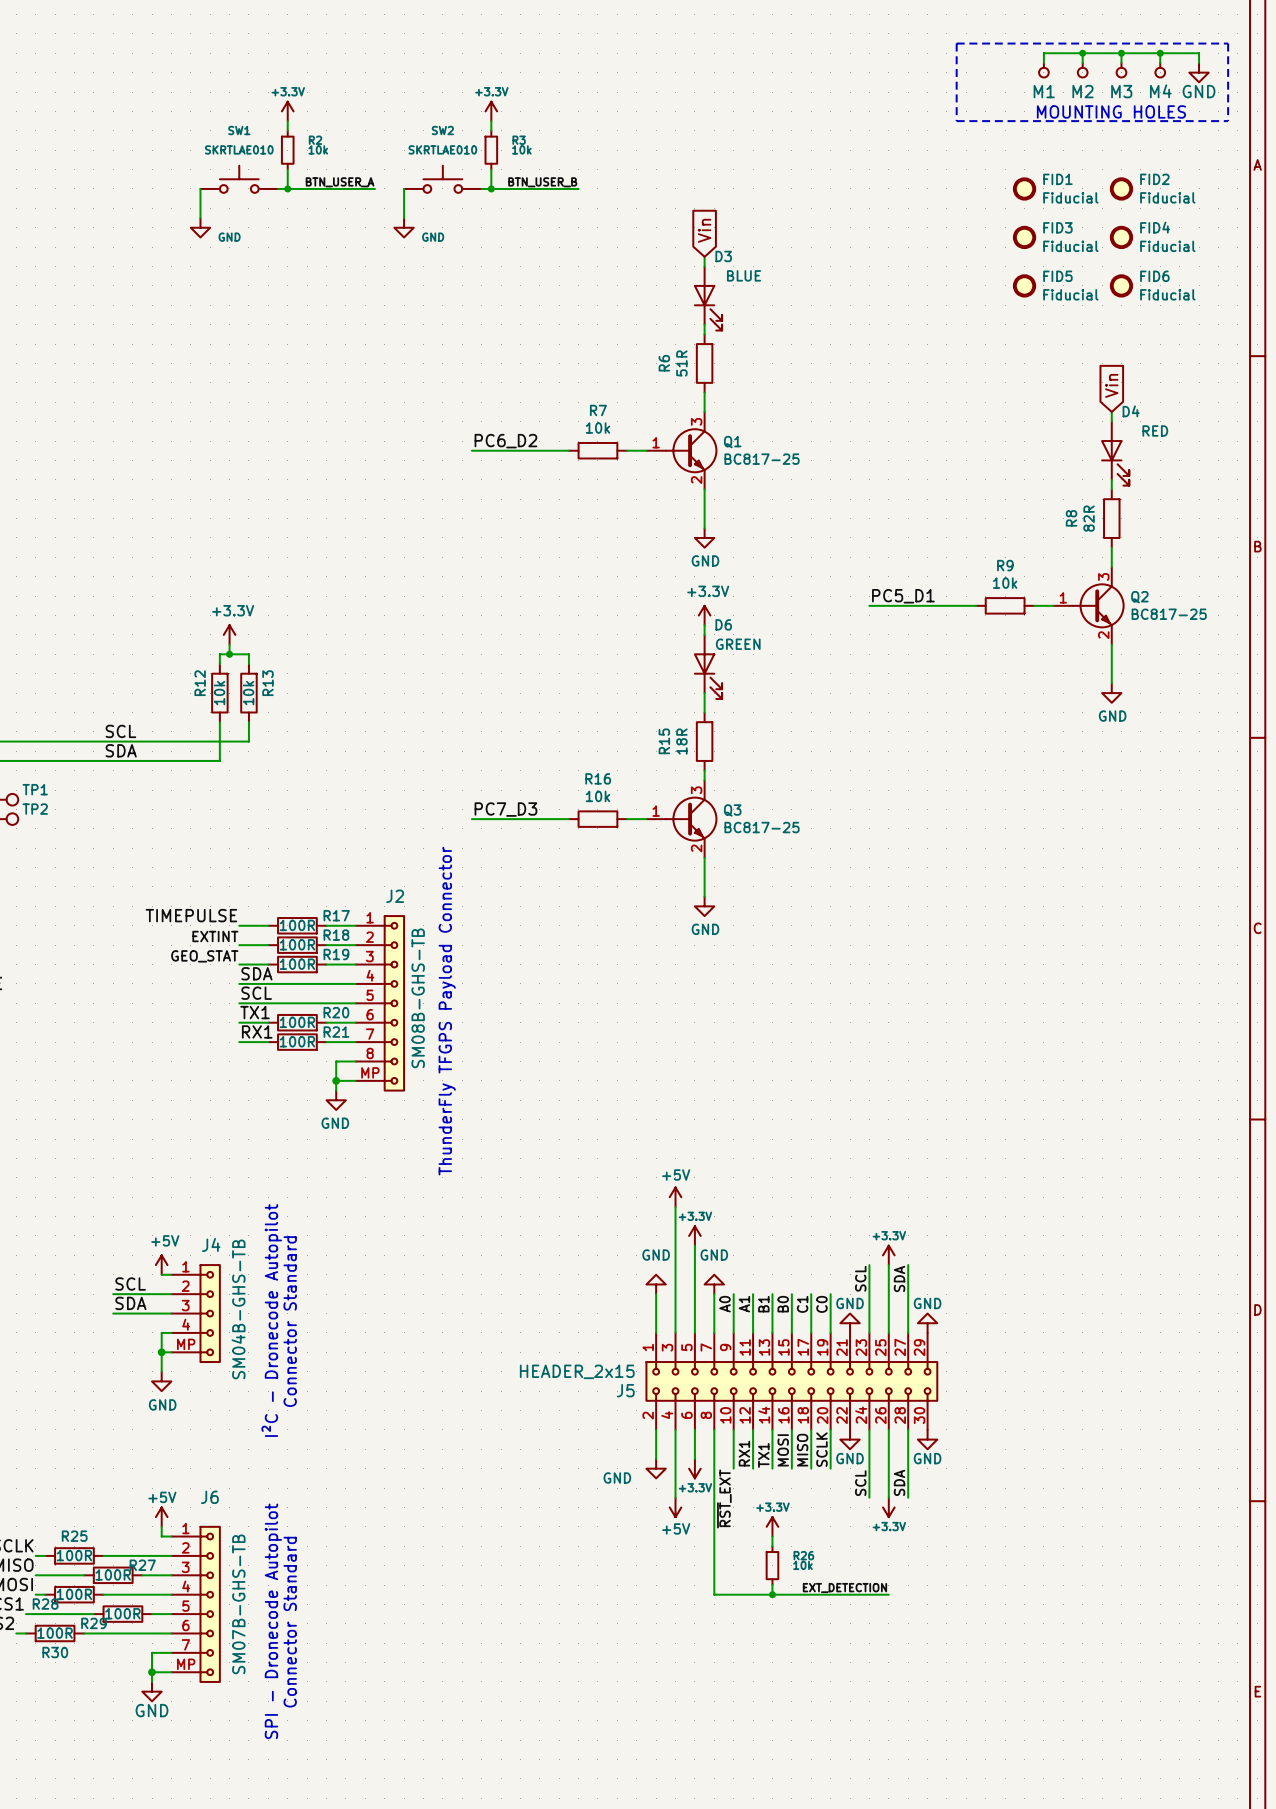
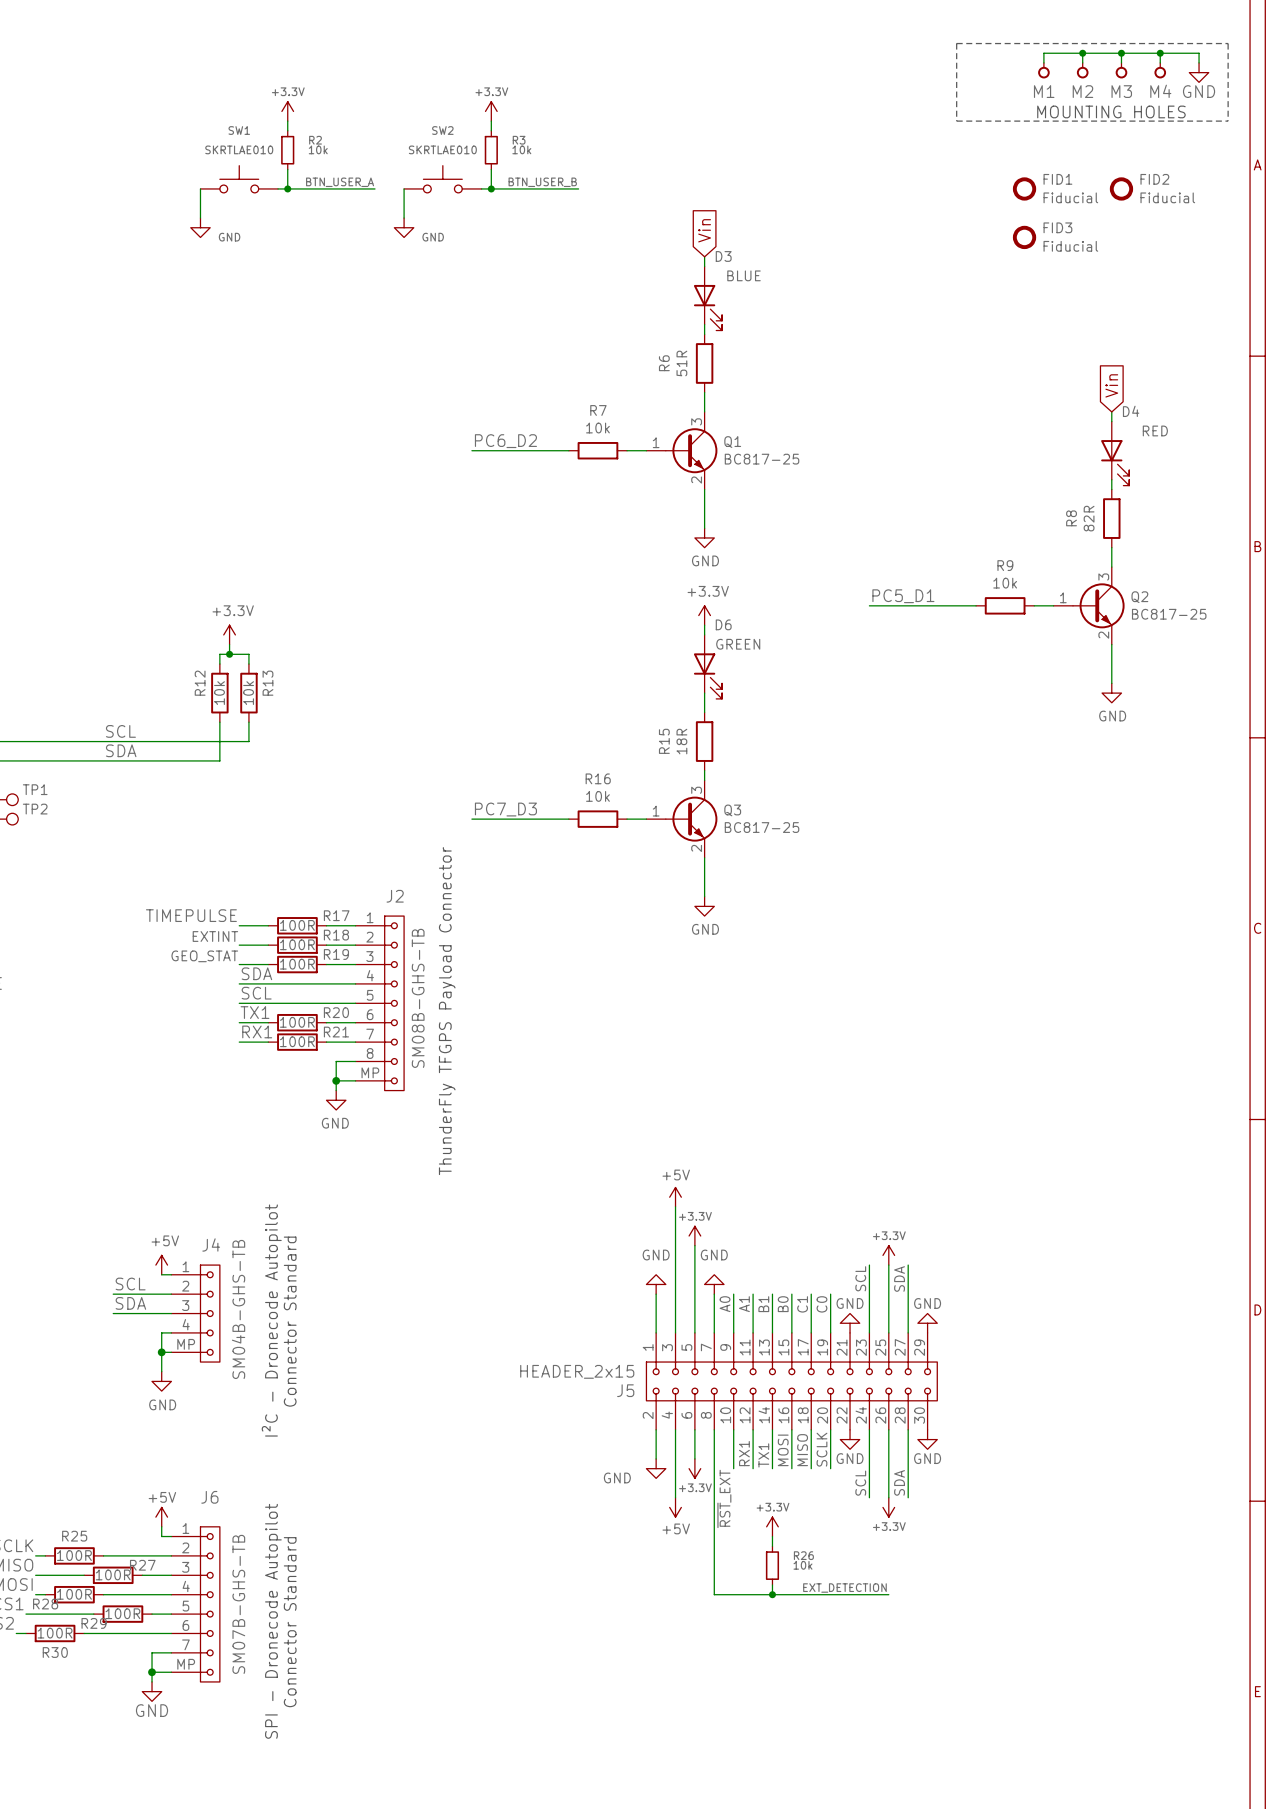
FID4: Fiducial (1121, 237) -> none
FID5: Fiducial (1024, 285) -> none
FID6: Fiducial (1121, 285) -> none

